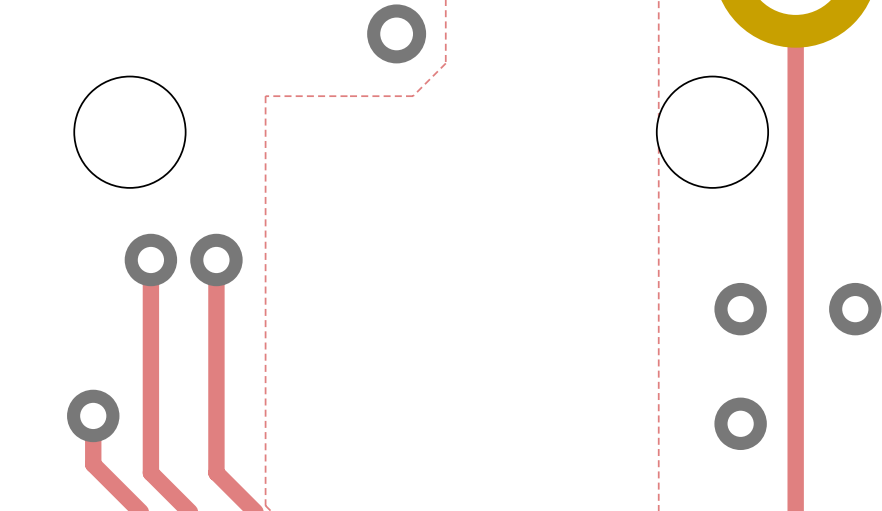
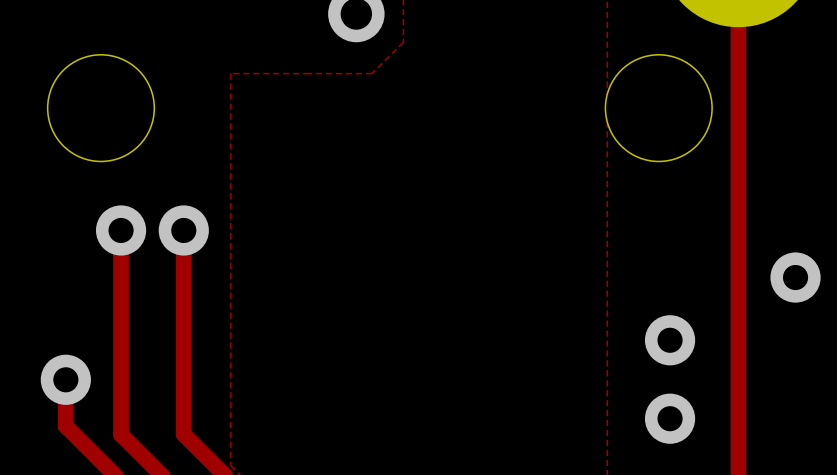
via: (740, 309) -> none
via: none -> (670, 340)
via: (740, 423) -> none
via: none -> (670, 418)

